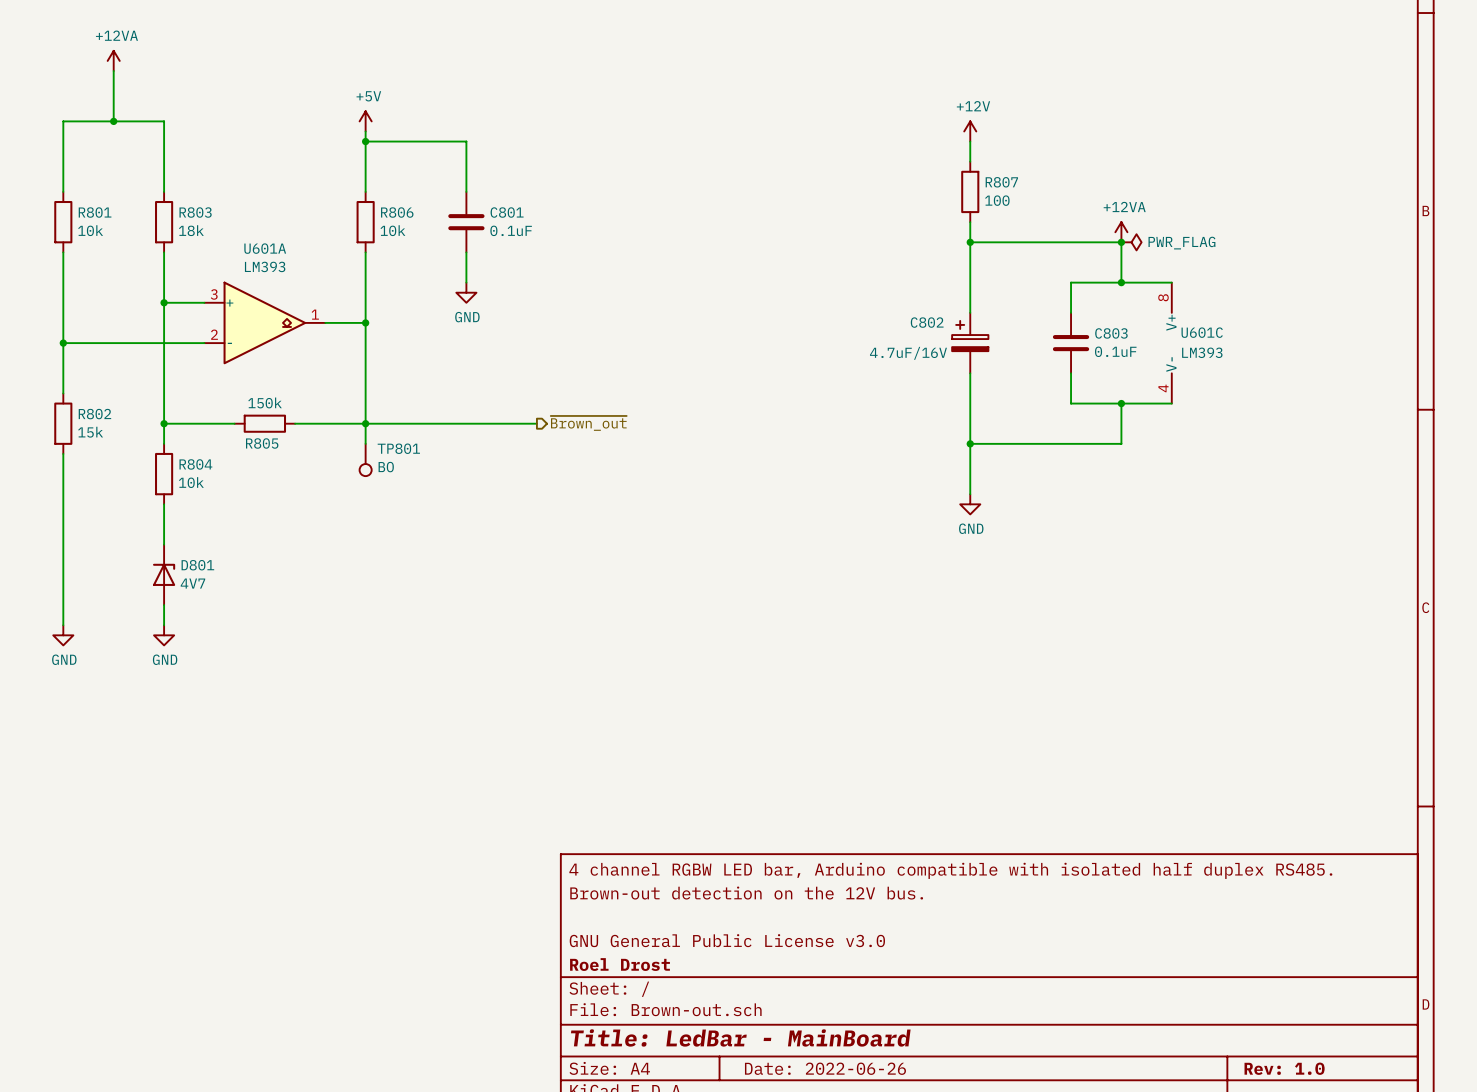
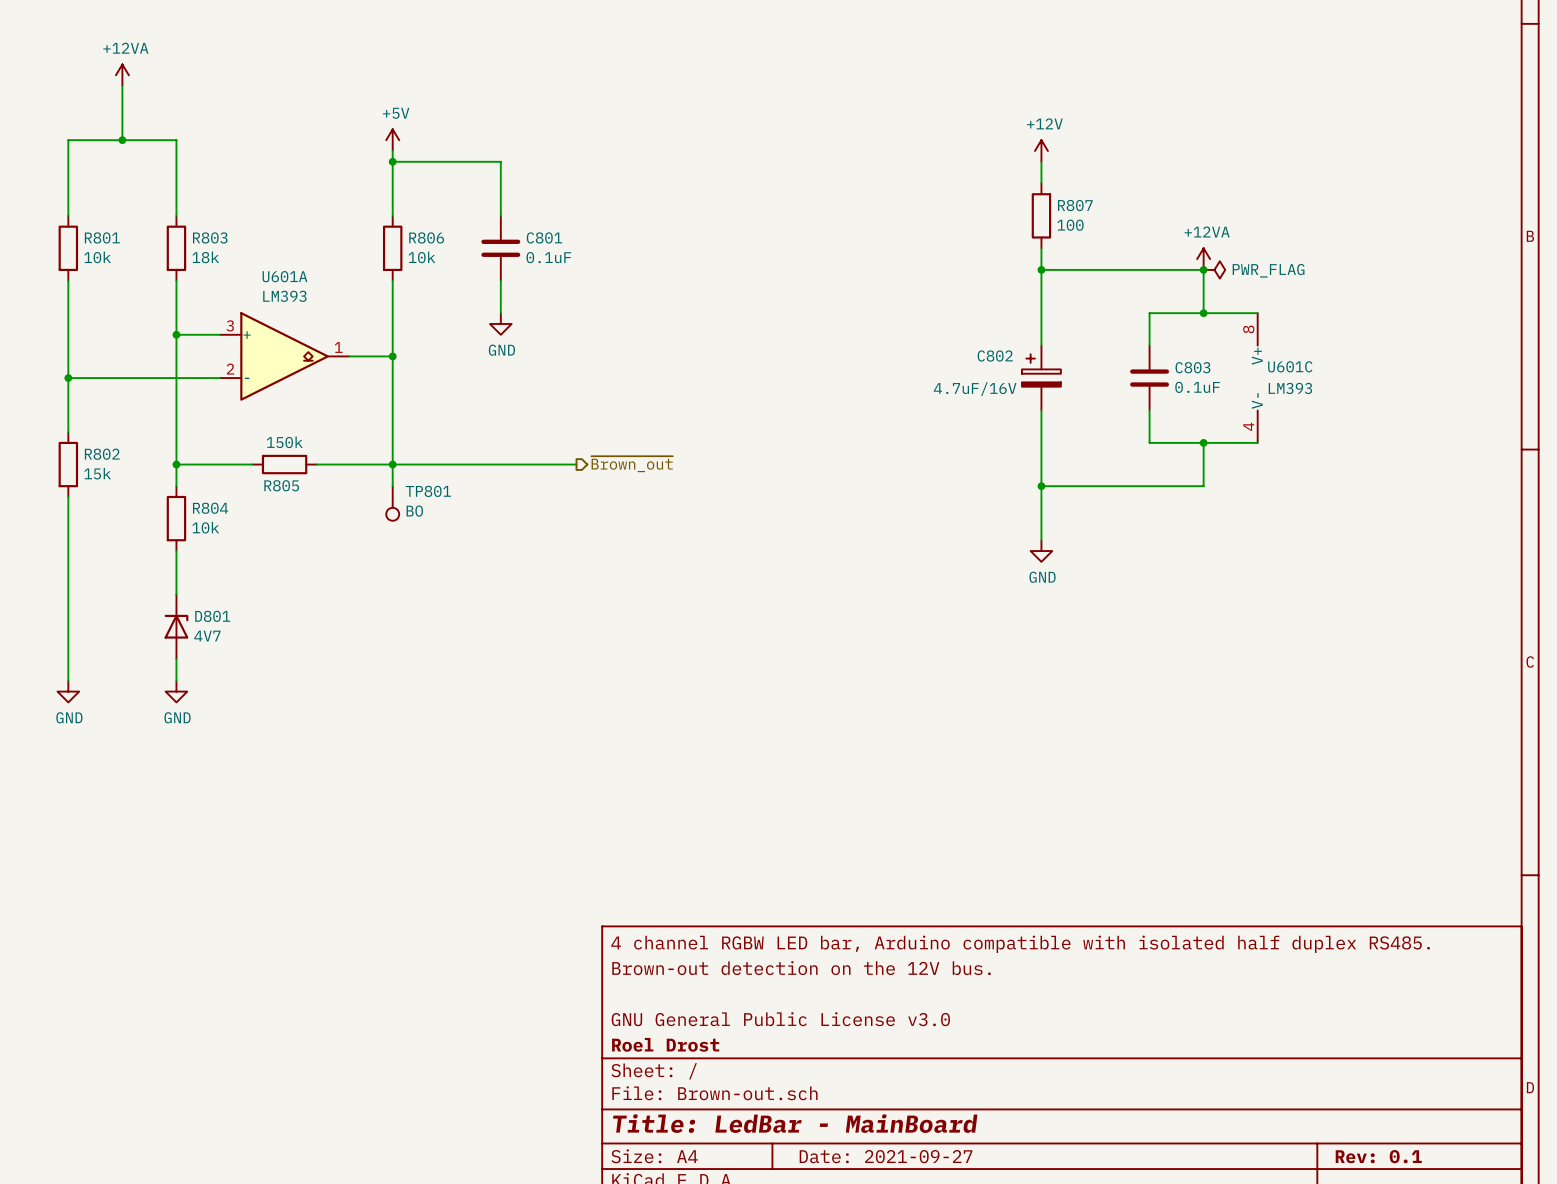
title block: Date: 2022-06-26 (825, 1068) -> Date: 2021-09-27 (886, 1156)
title block: Rev: 1.0 (1284, 1068) -> Rev: 0.1 (1378, 1156)

